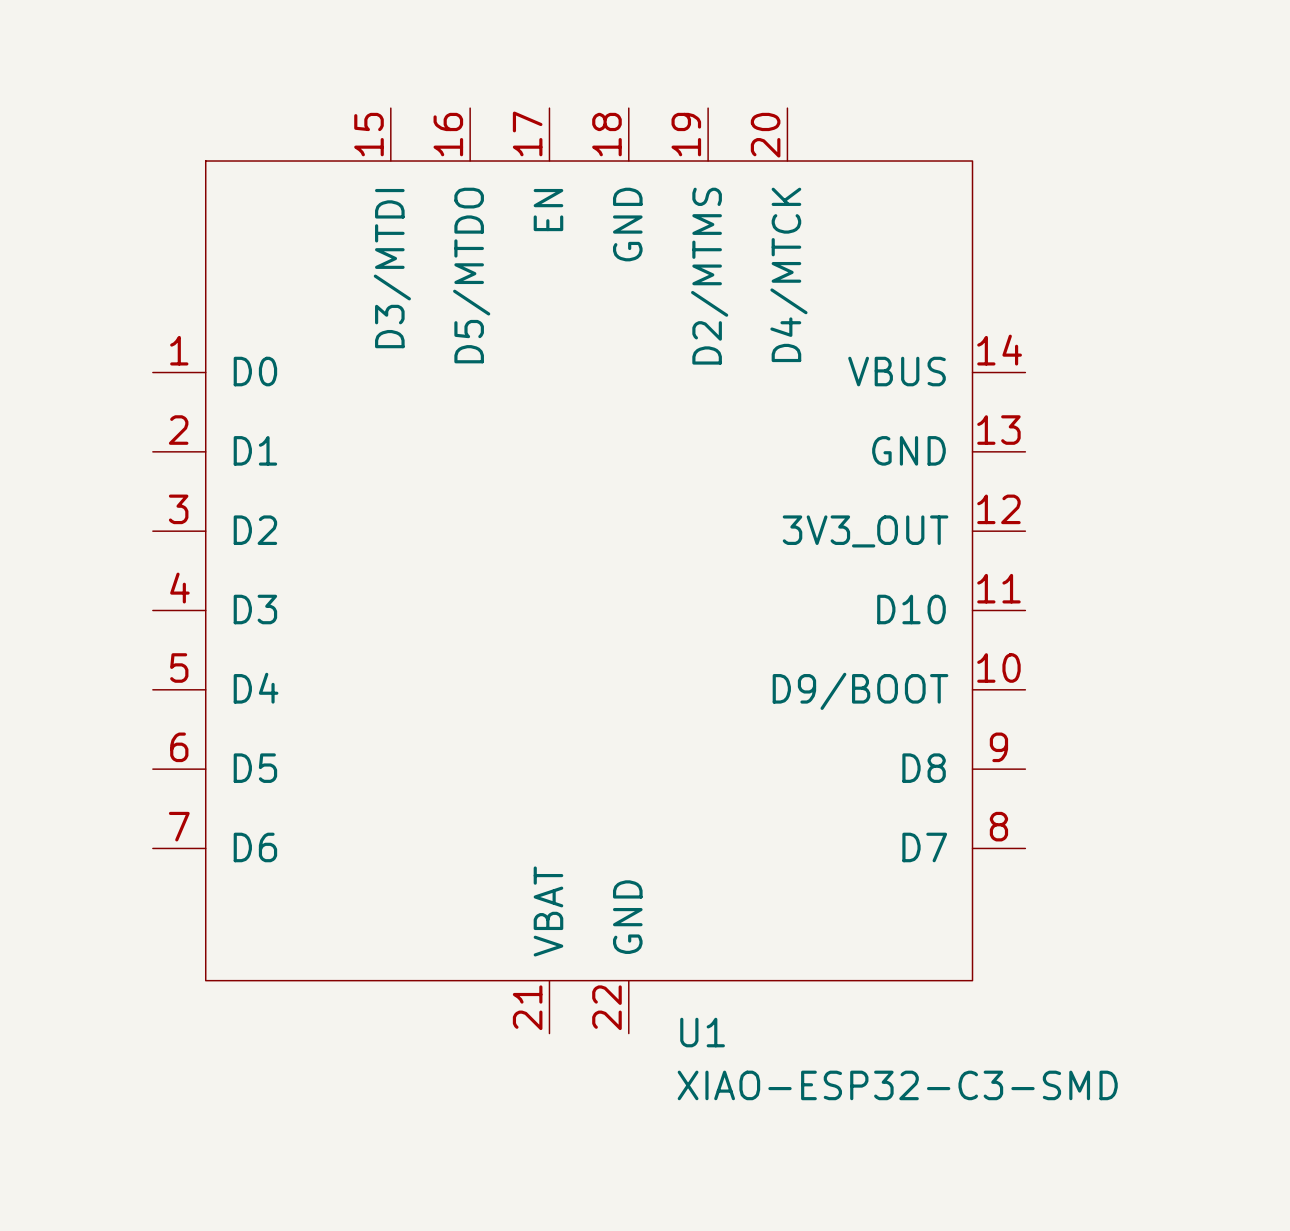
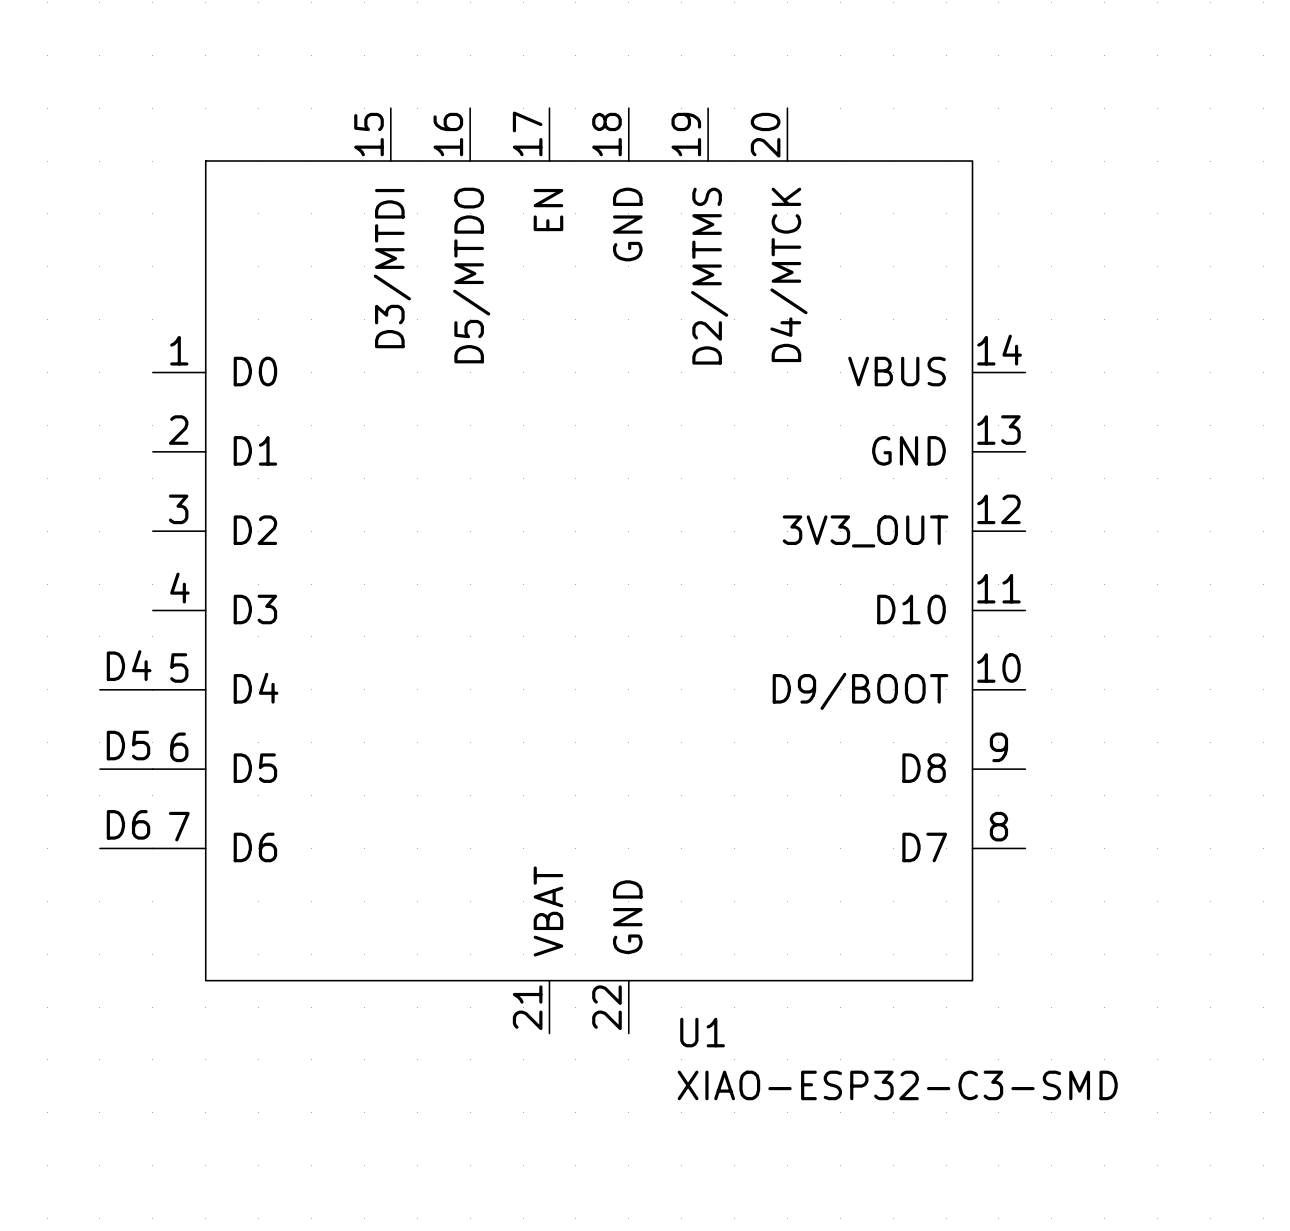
label: none -> D4 (129, 665)
wire: none -> (99, 689) (152, 689)
label: none -> D5 (128, 745)
wire: none -> (99, 769) (152, 769)
label: none -> D6 (128, 824)
wire: none -> (99, 848) (152, 848)

